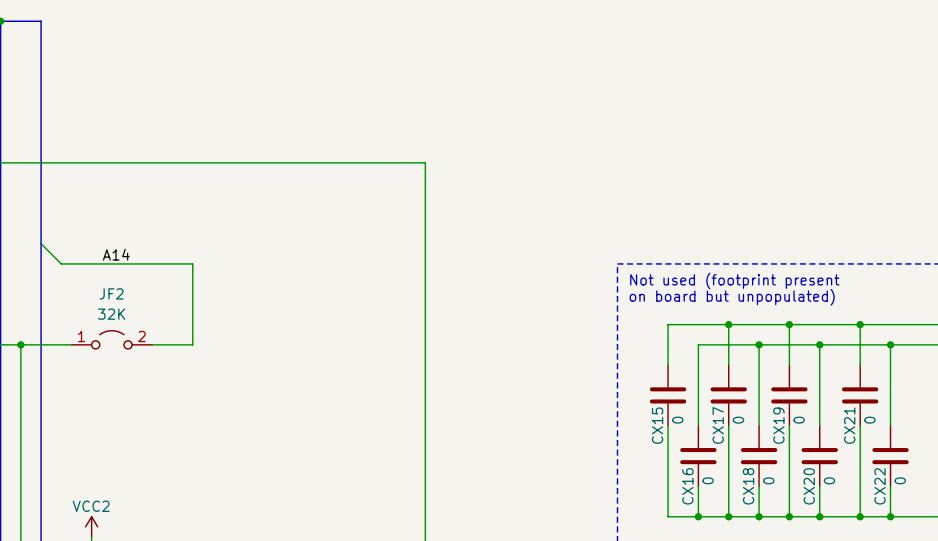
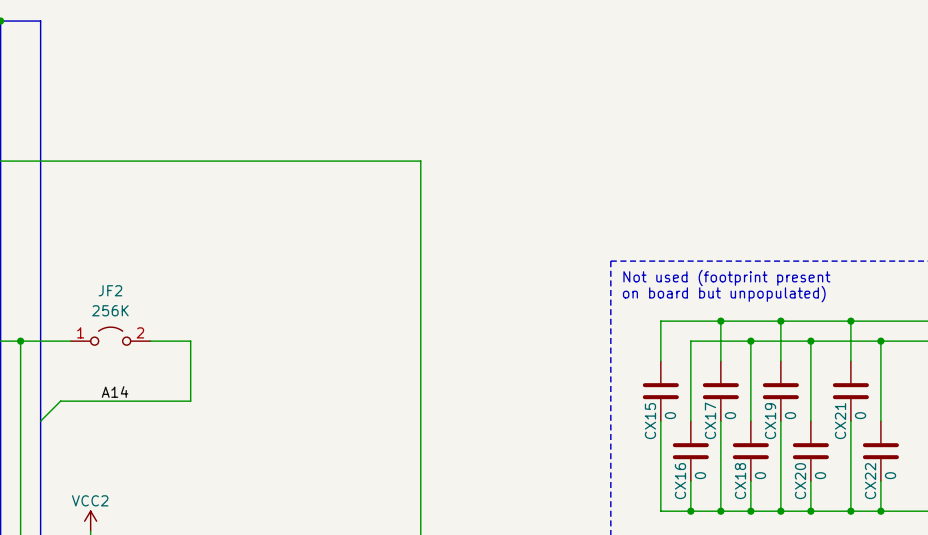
wire: (41, 243) (61, 263) (192, 263) (192, 344) -> (40, 421) (60, 401) (190, 401) (190, 341)
label position: A14 (116, 254) -> A14 (115, 391)
JF2 value: 32K (111, 314) -> 256K (110, 310)

